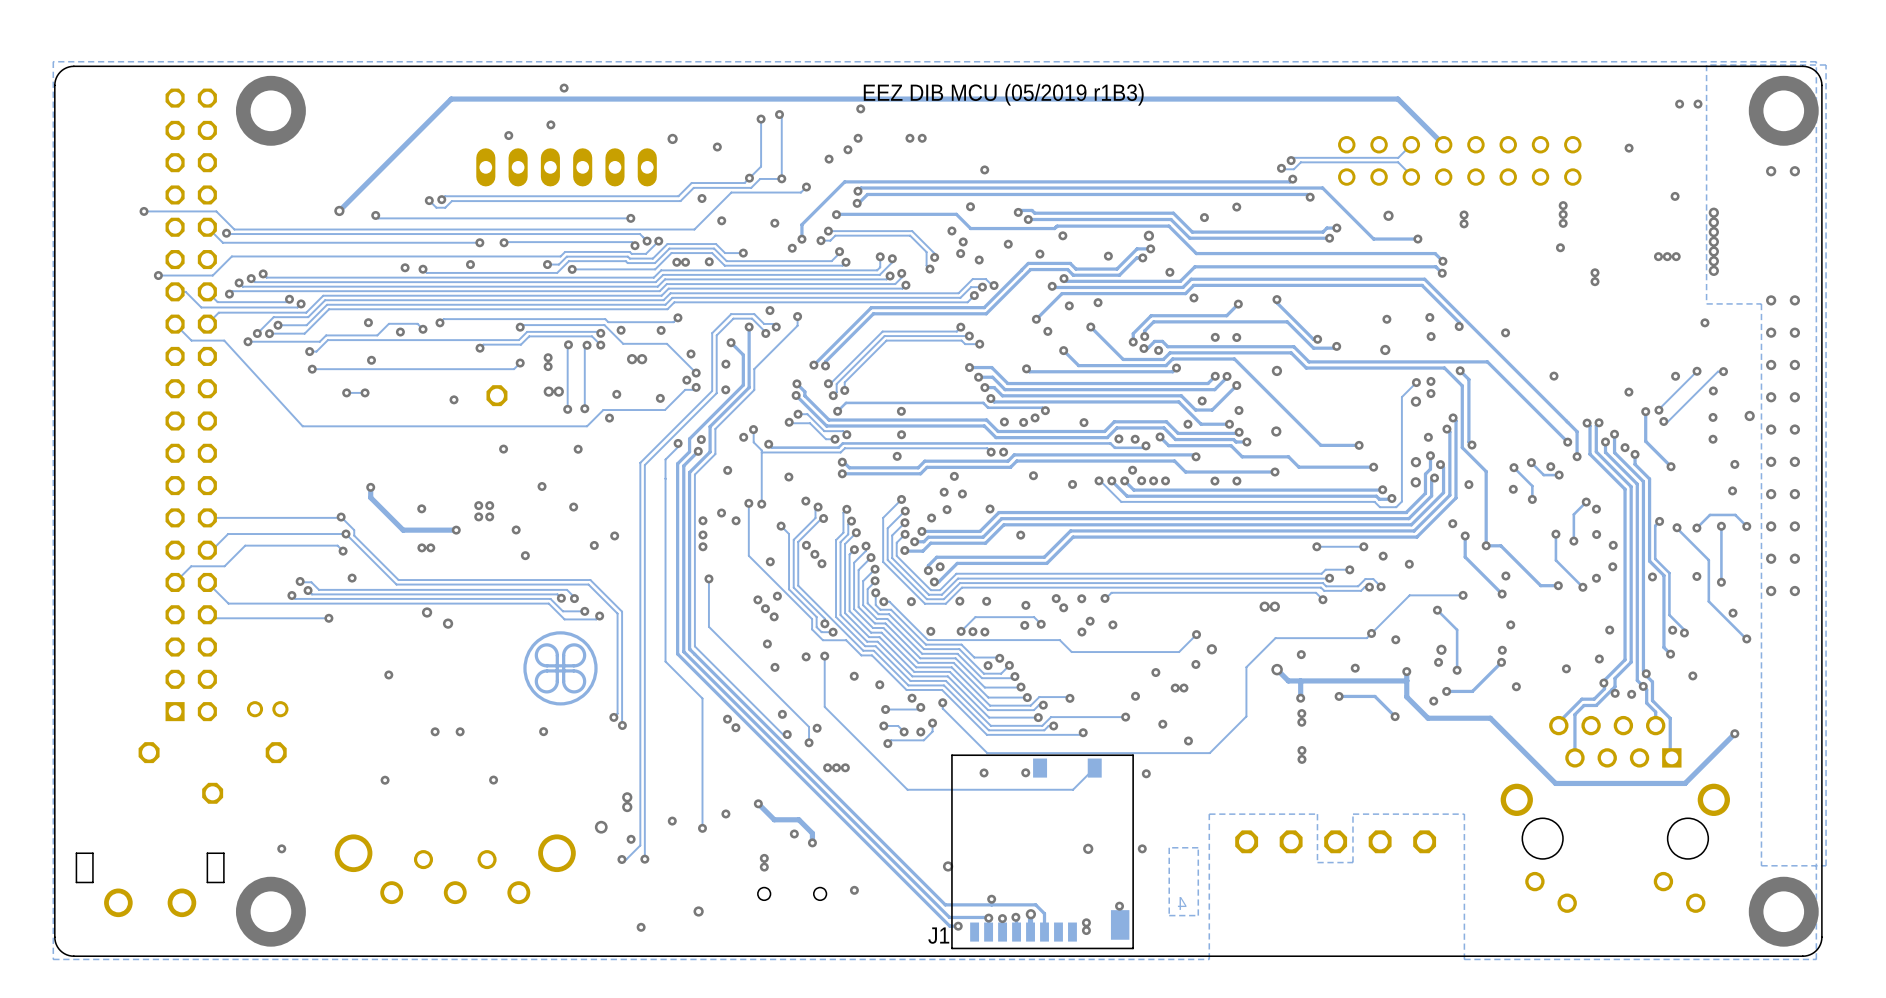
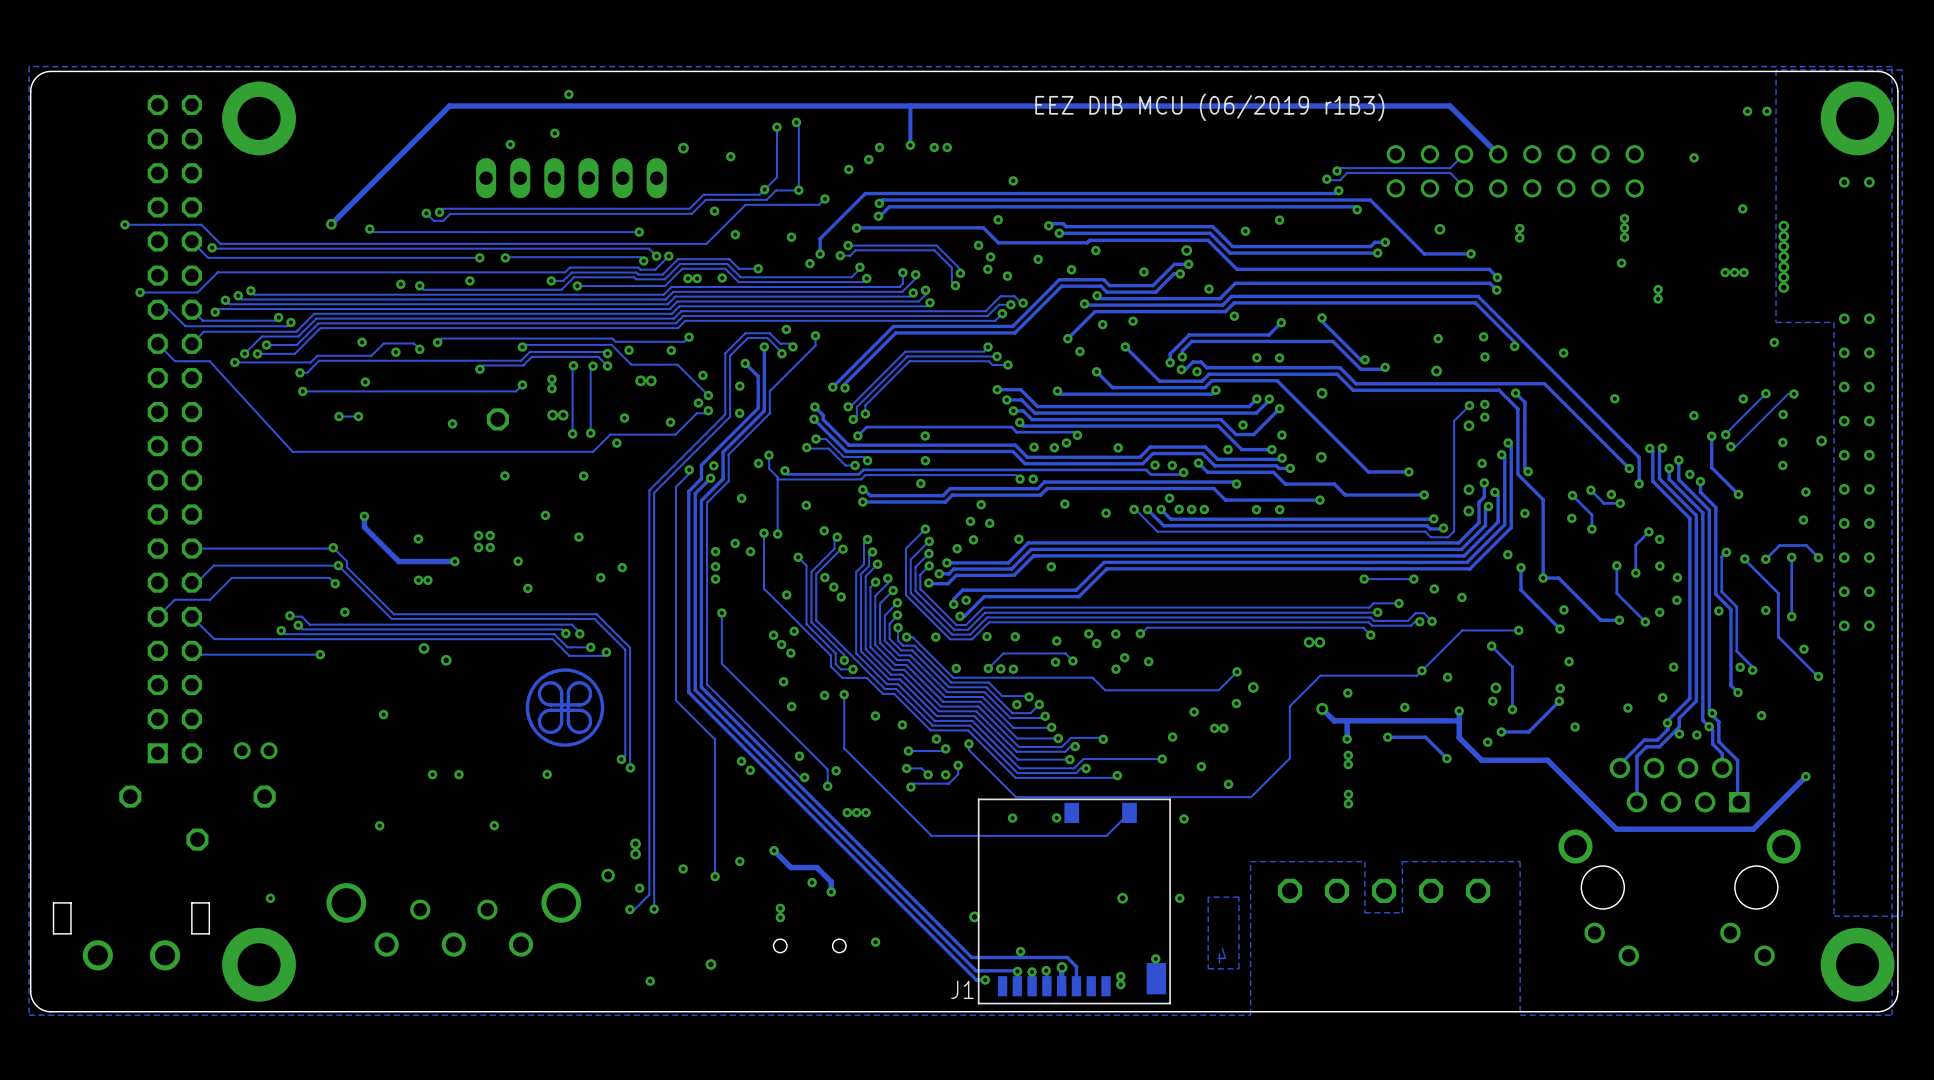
text: EEZ DIB MCU (05/2019 r1B3) (1003, 94) -> EEZ DIB MCU (06/2019 r1B3) (1209, 107)
track: none -> (910, 106) (910, 145)
via position: (860, 108) -> (910, 145)

